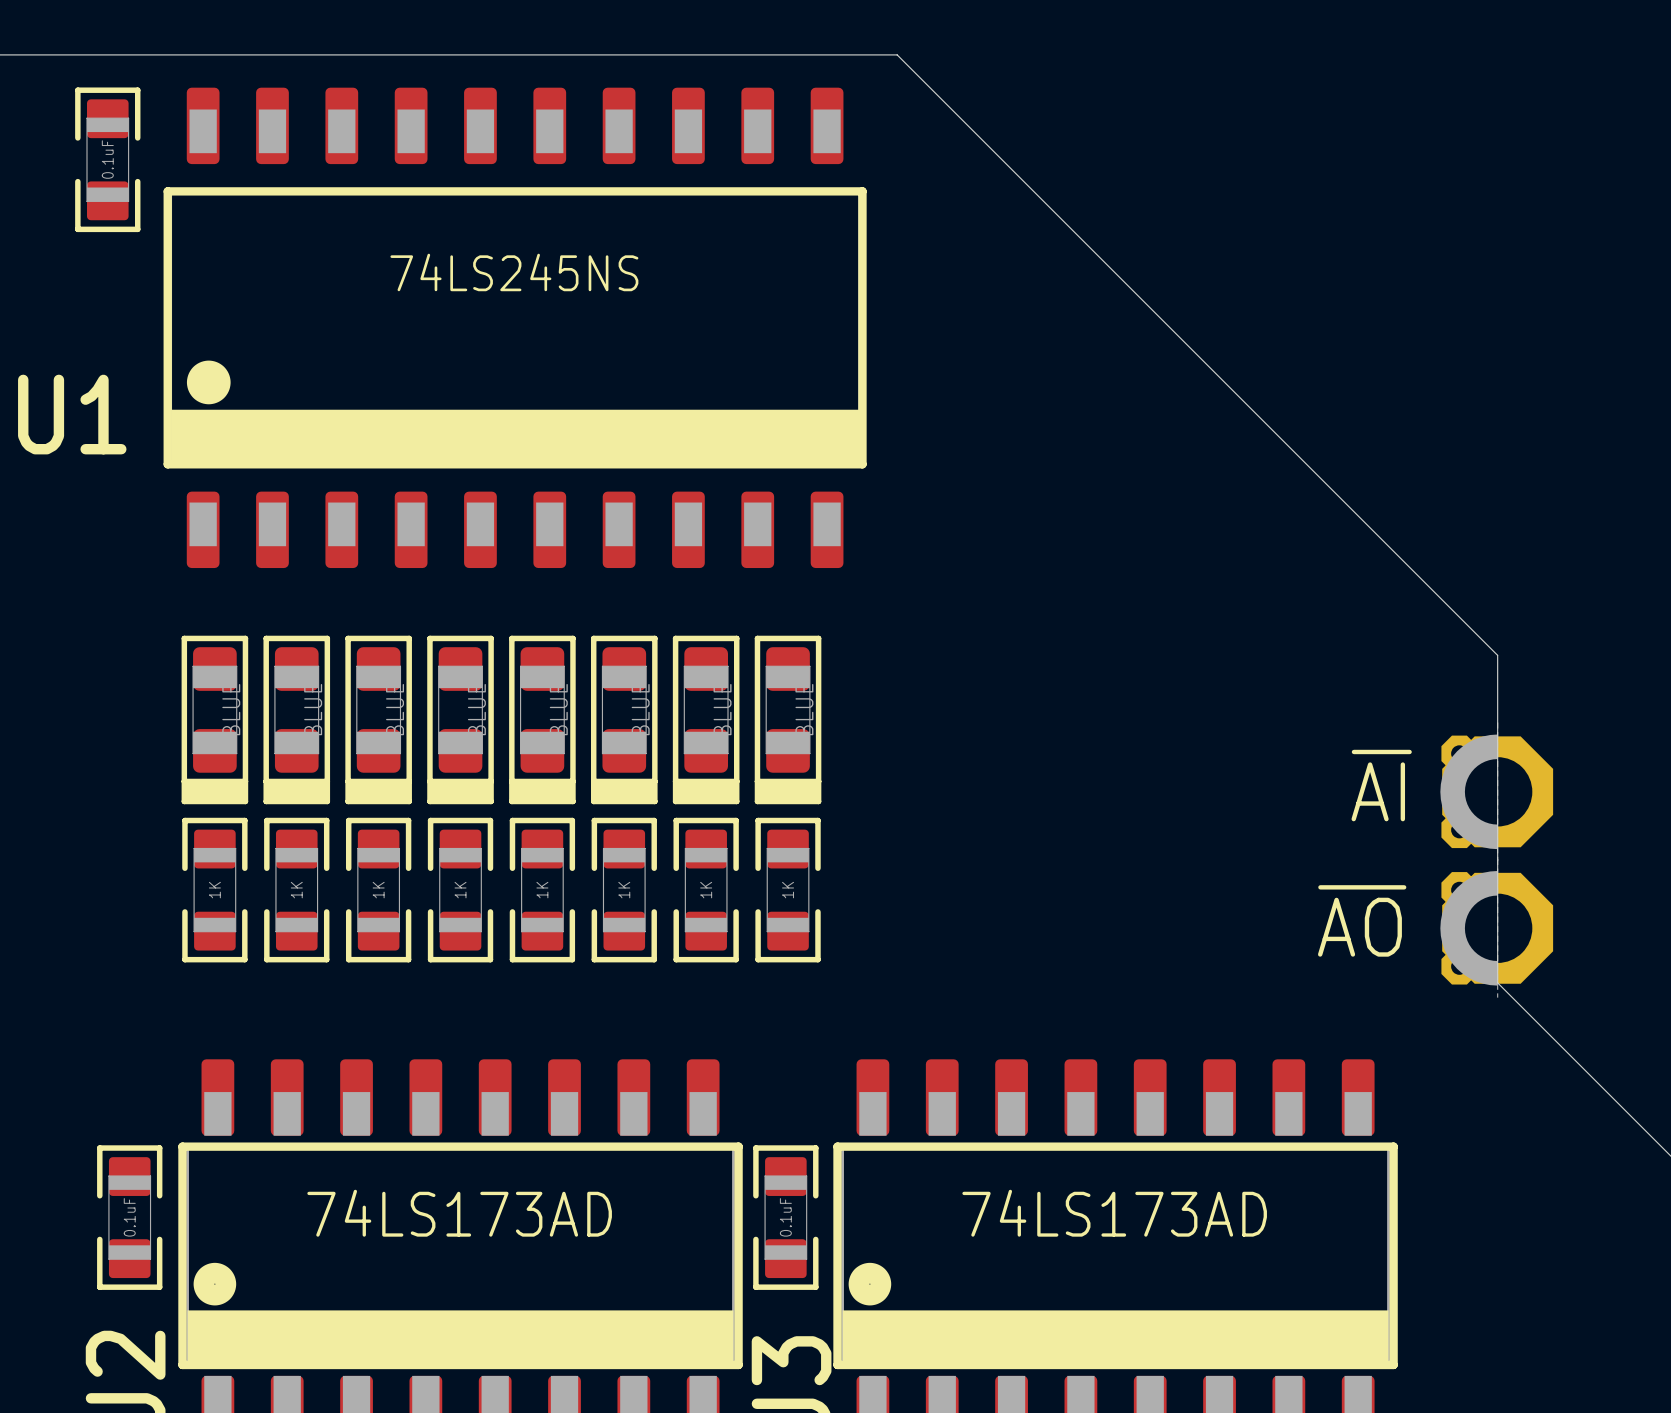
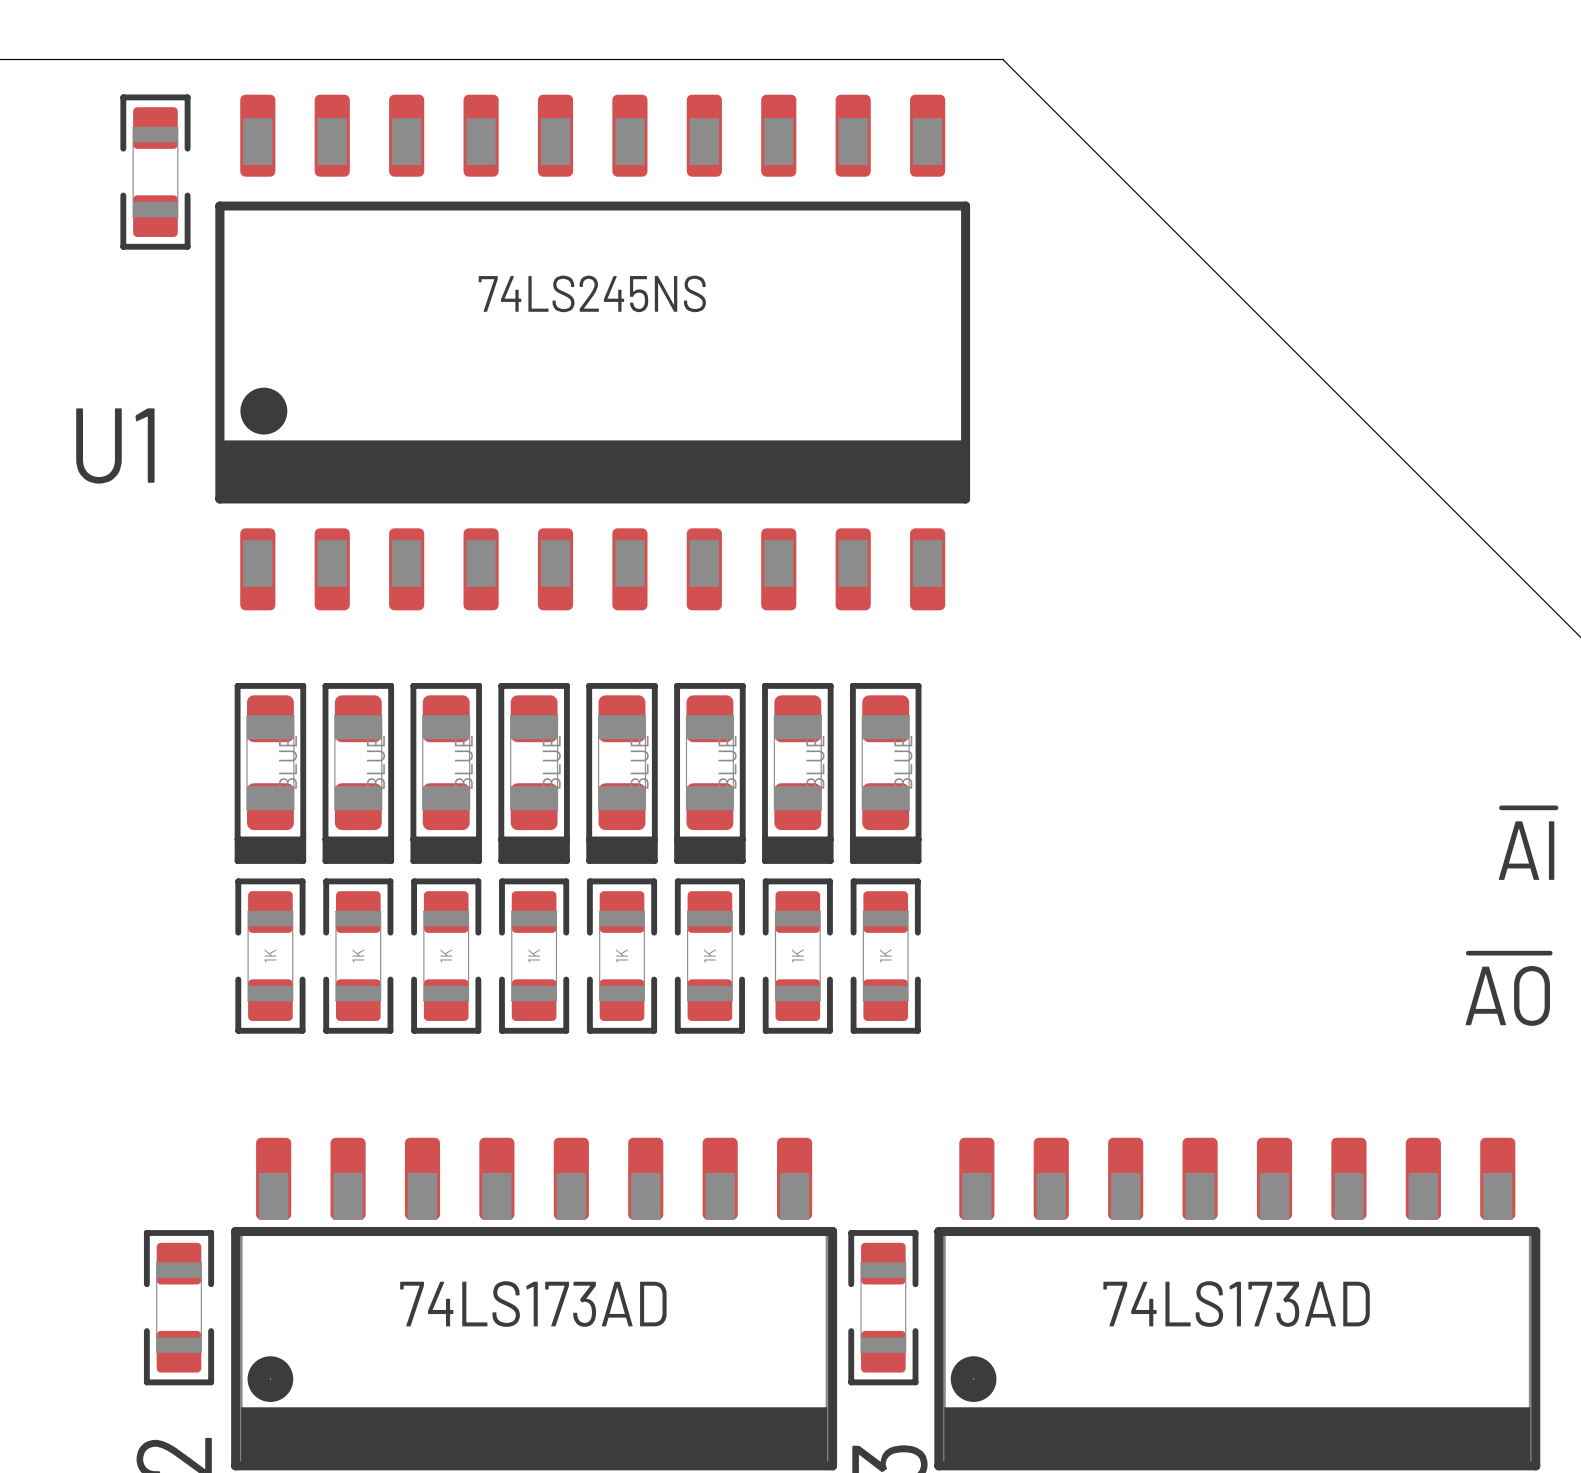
part value: 0.1uF (107, 159) -> none
part value: 0.1uF (129, 1217) -> none
part value: 0.1uF (785, 1217) -> none

